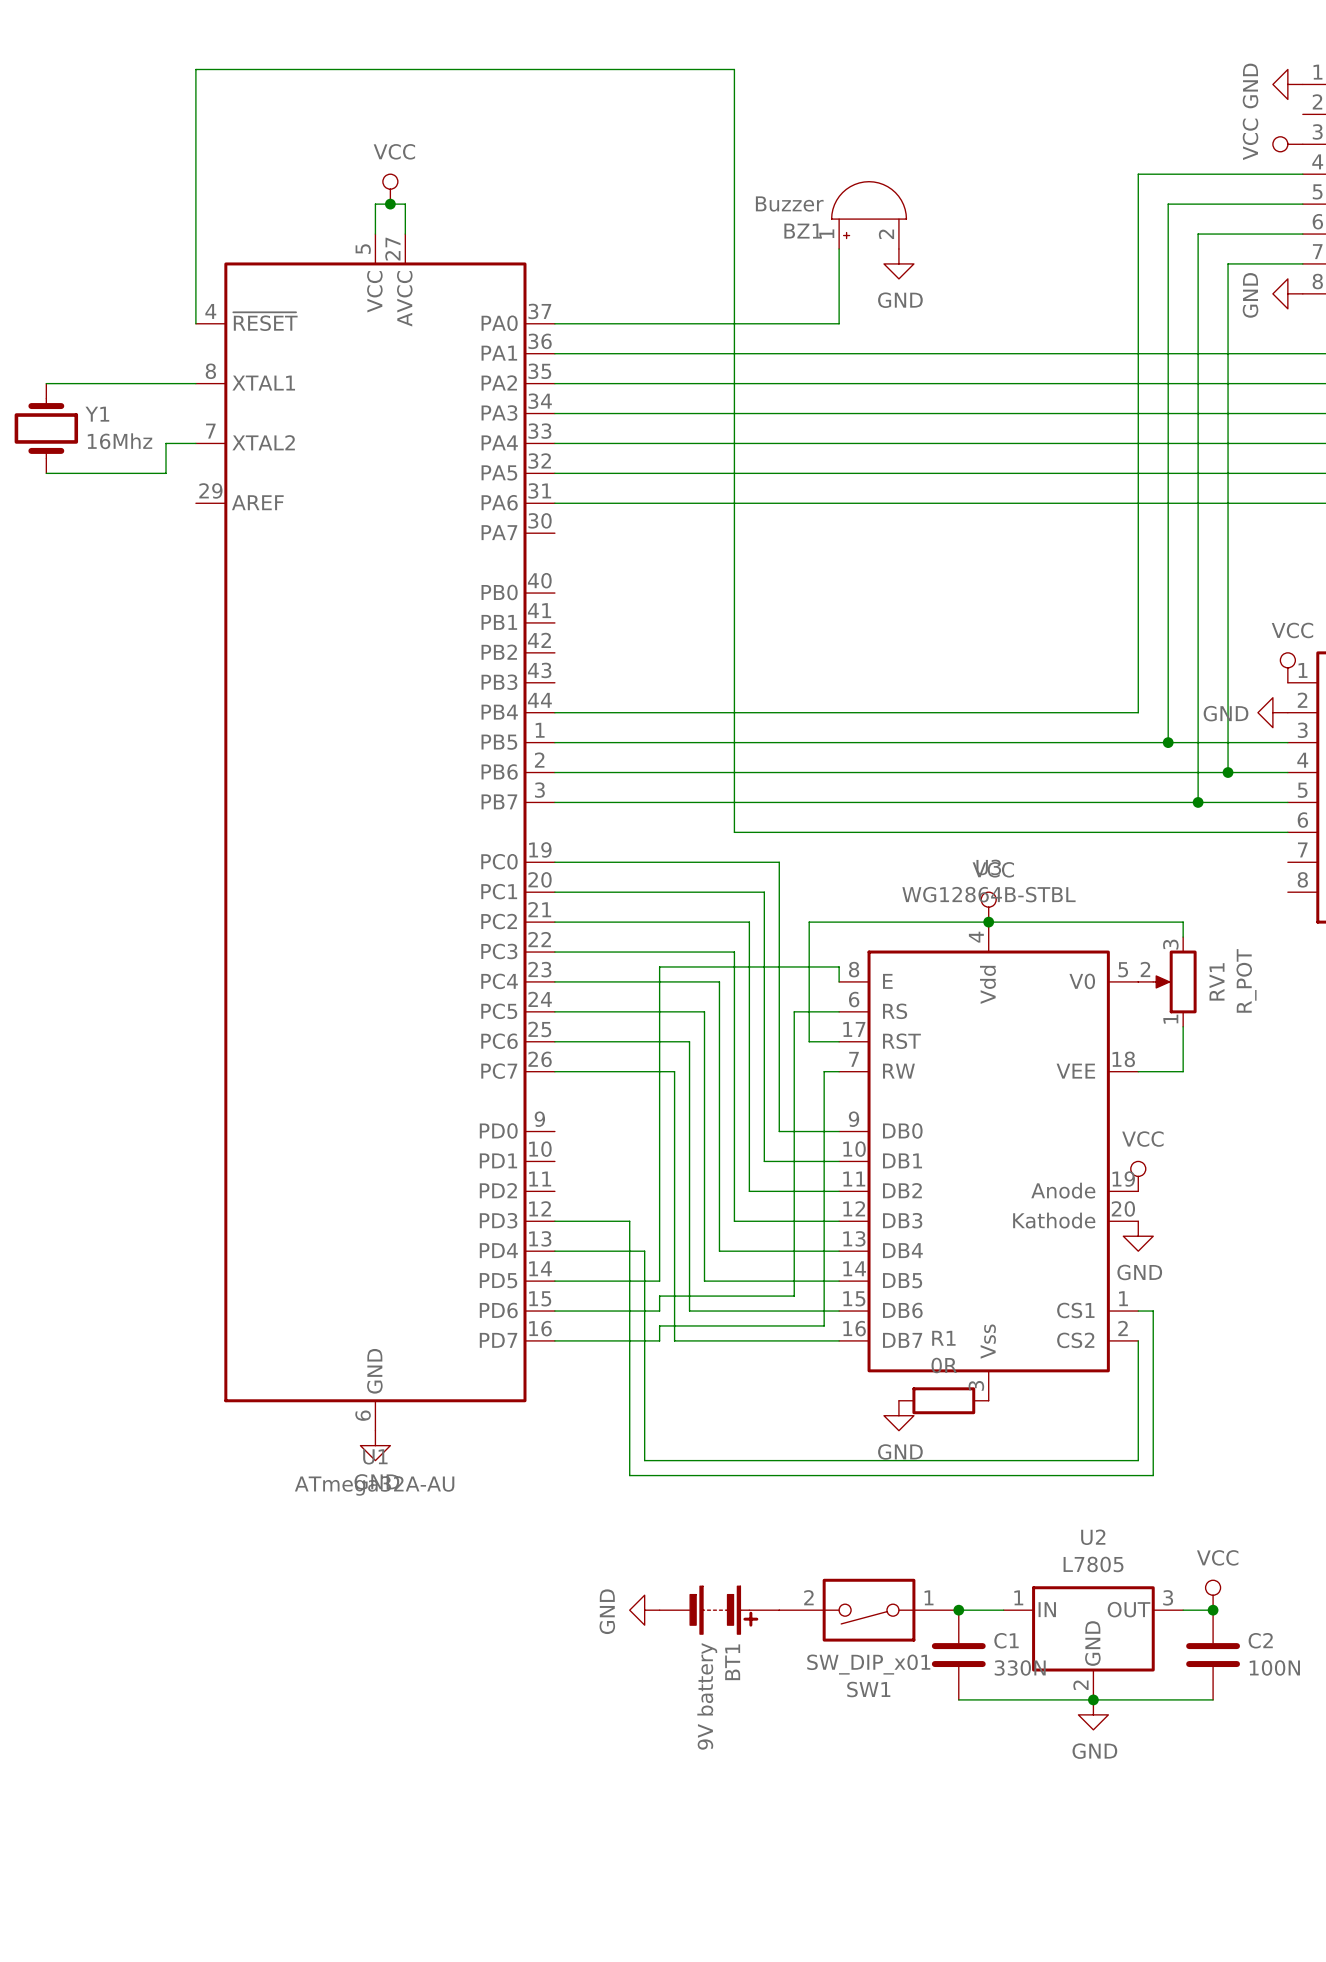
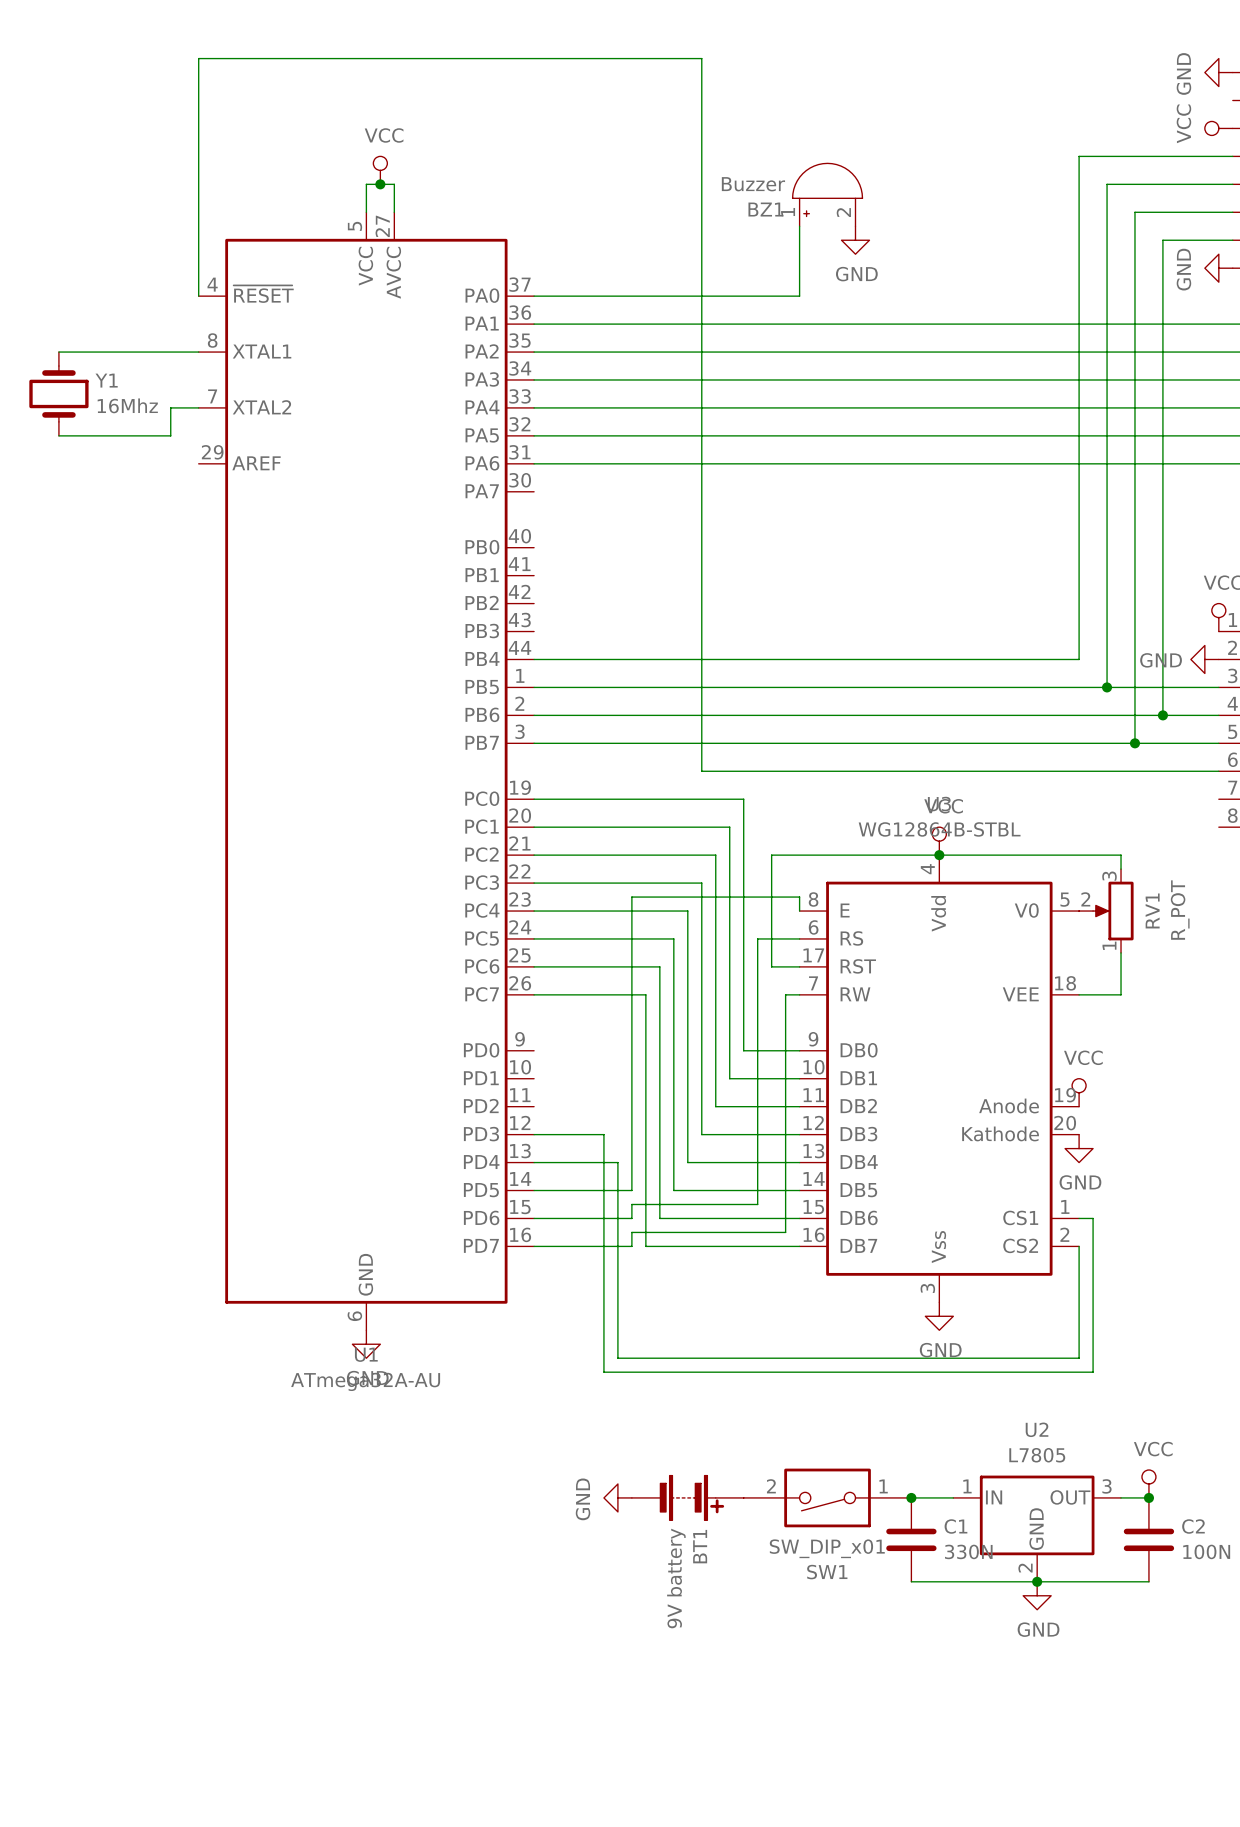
R1: 0R (943, 1400) -> none
power symbol position: GND (898, 1415) -> GND (939, 1316)

